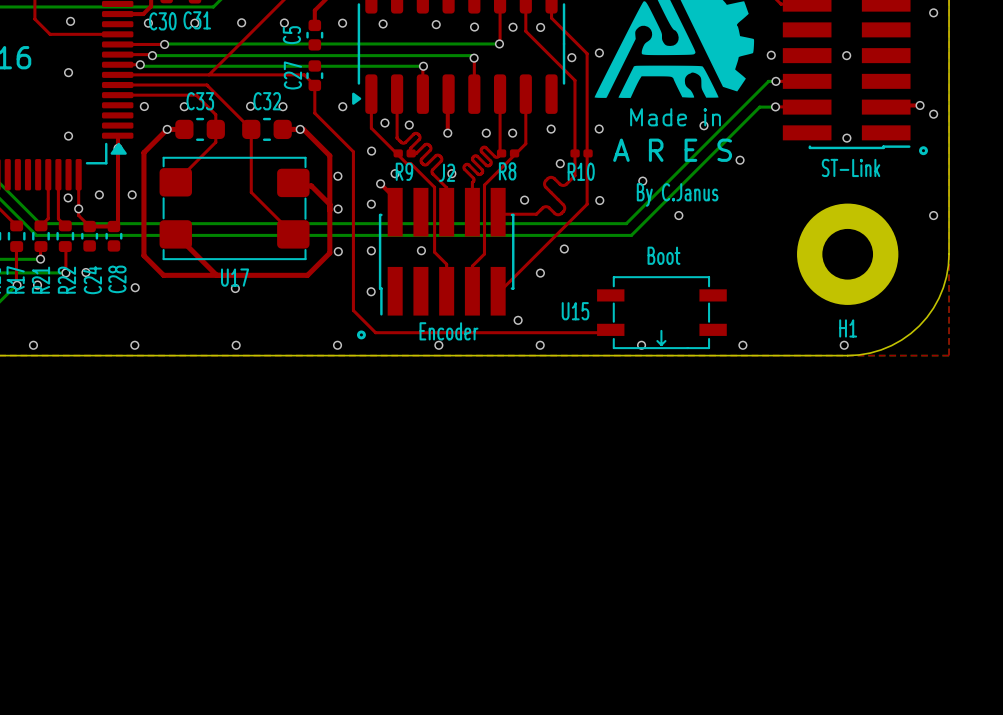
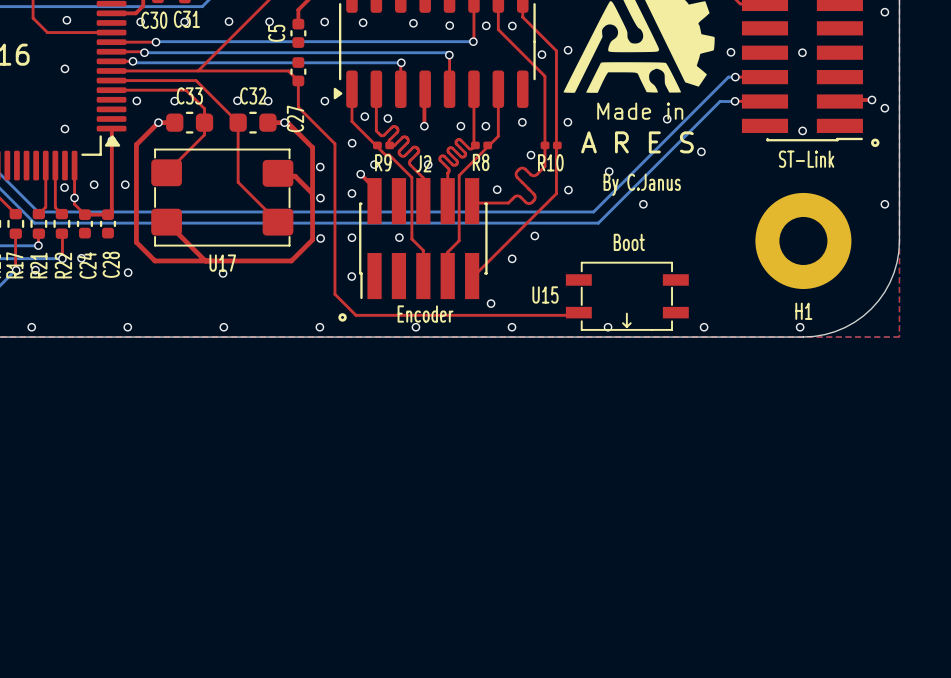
C27 name position: C27 (292, 75) -> C27 (295, 118)

